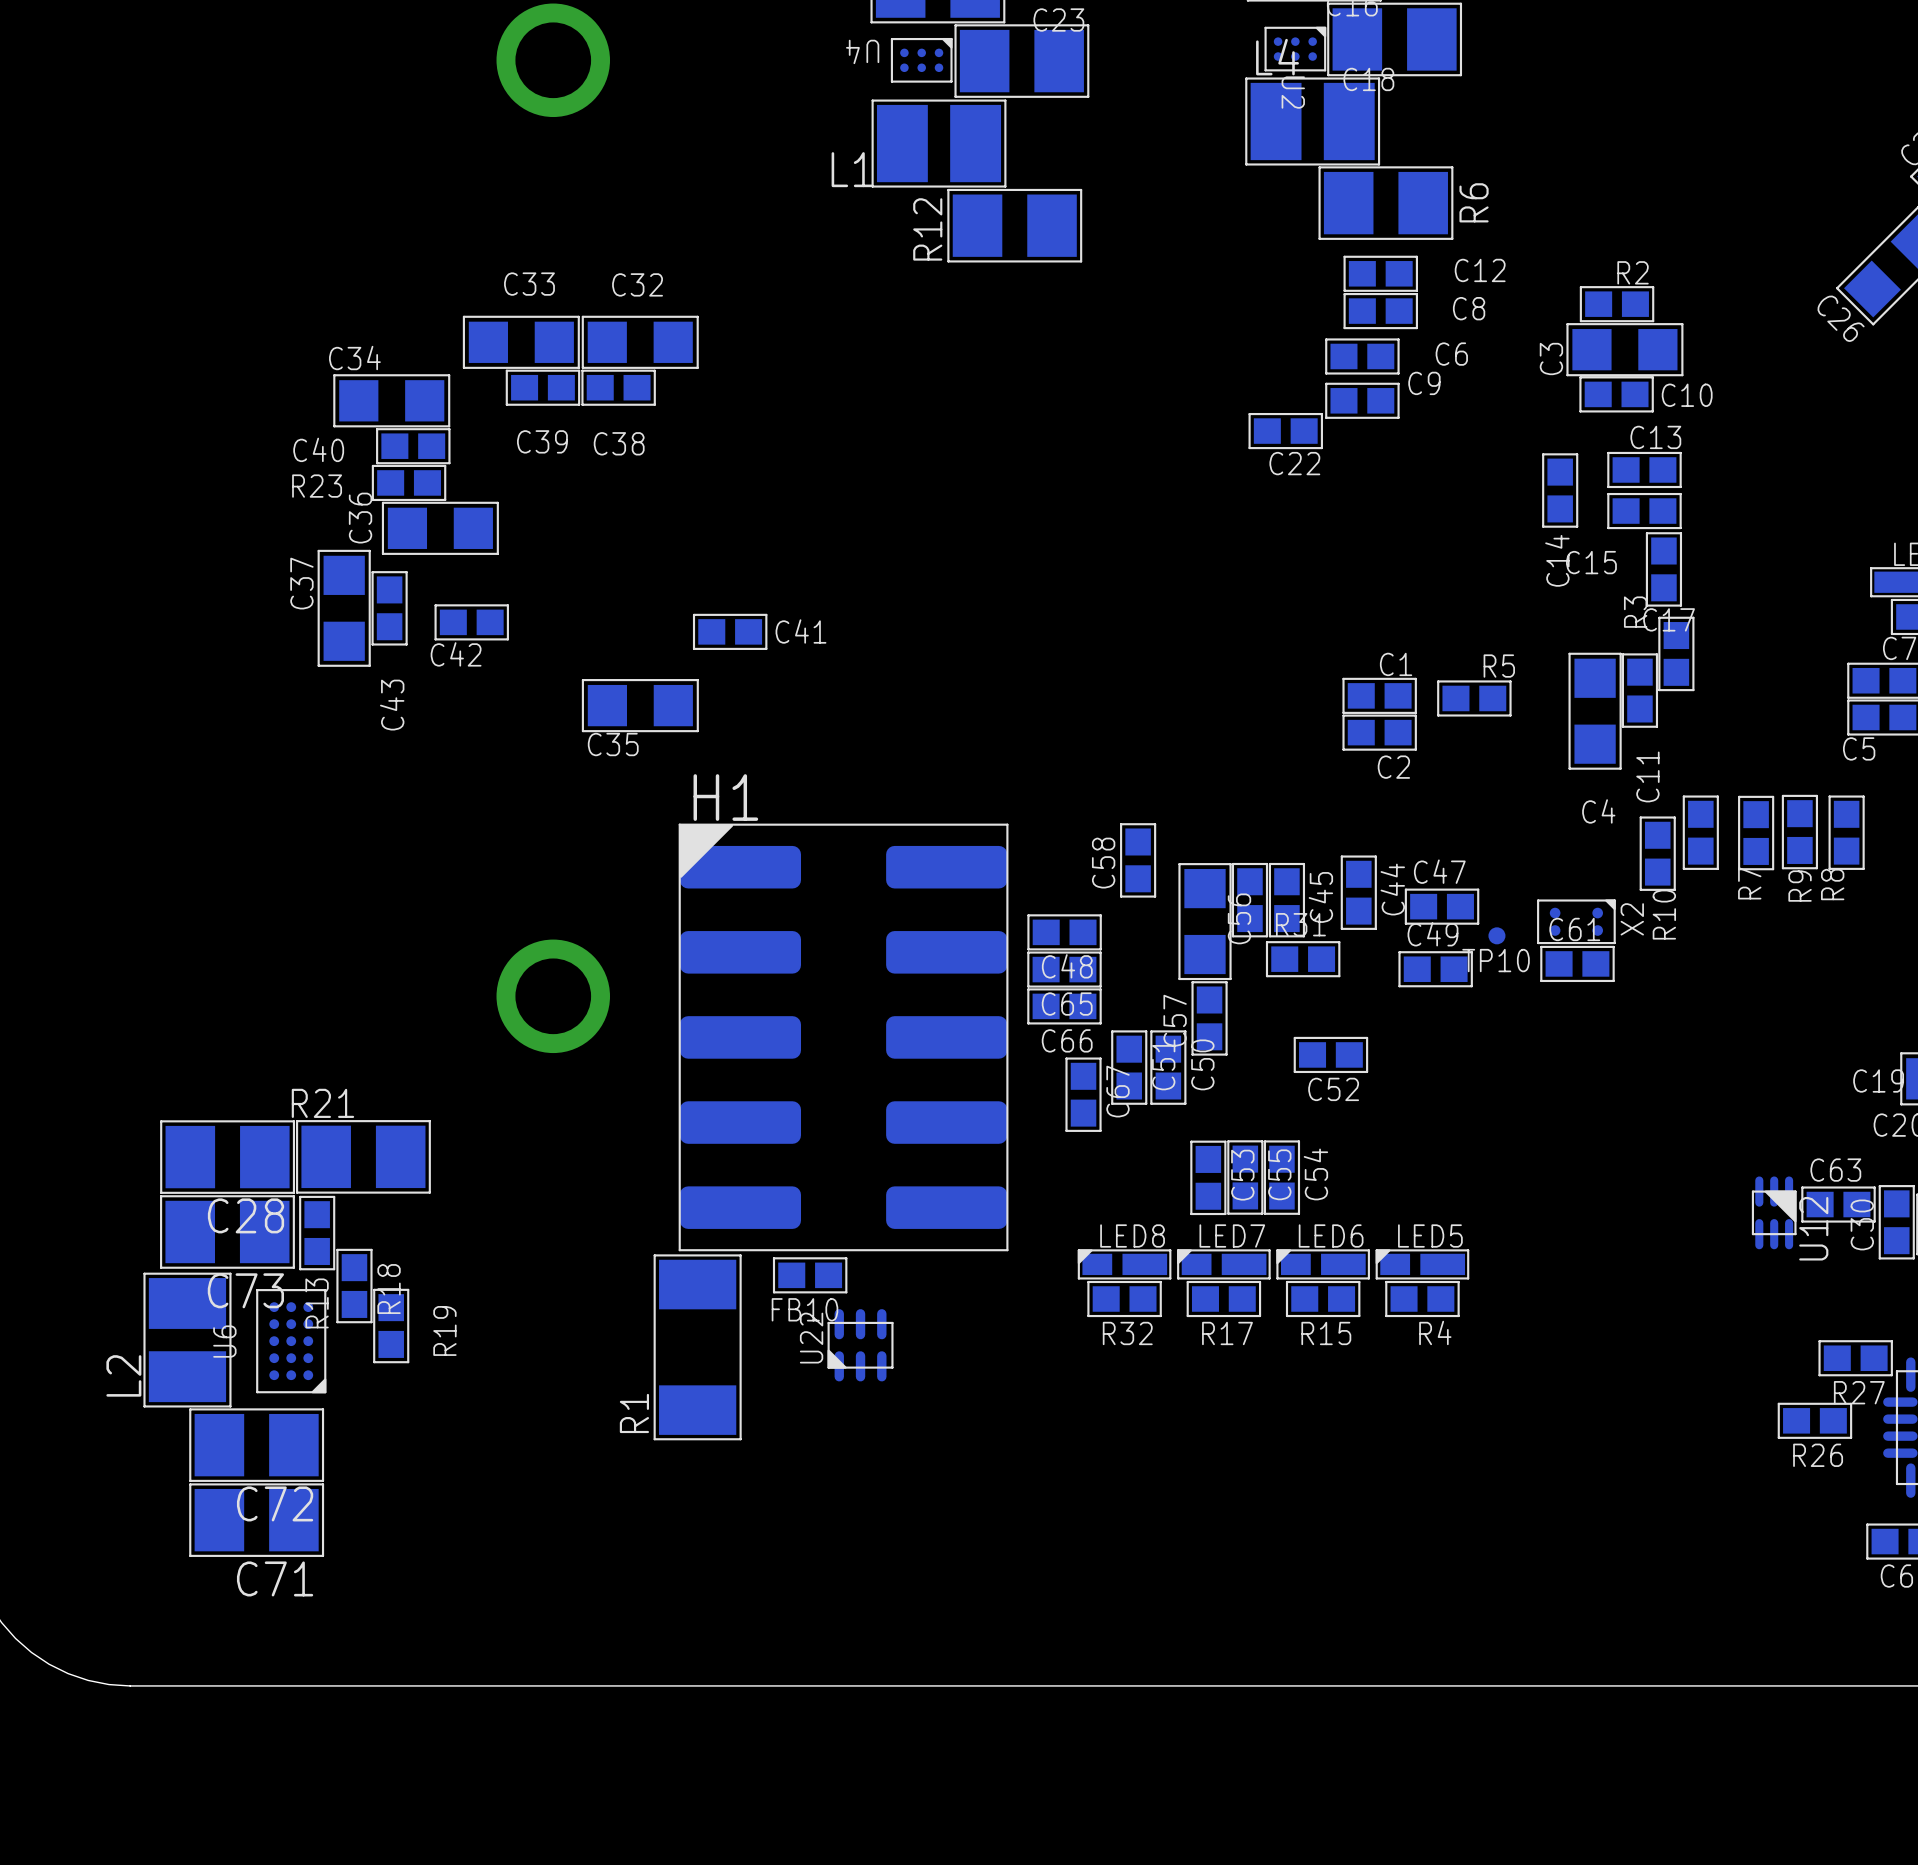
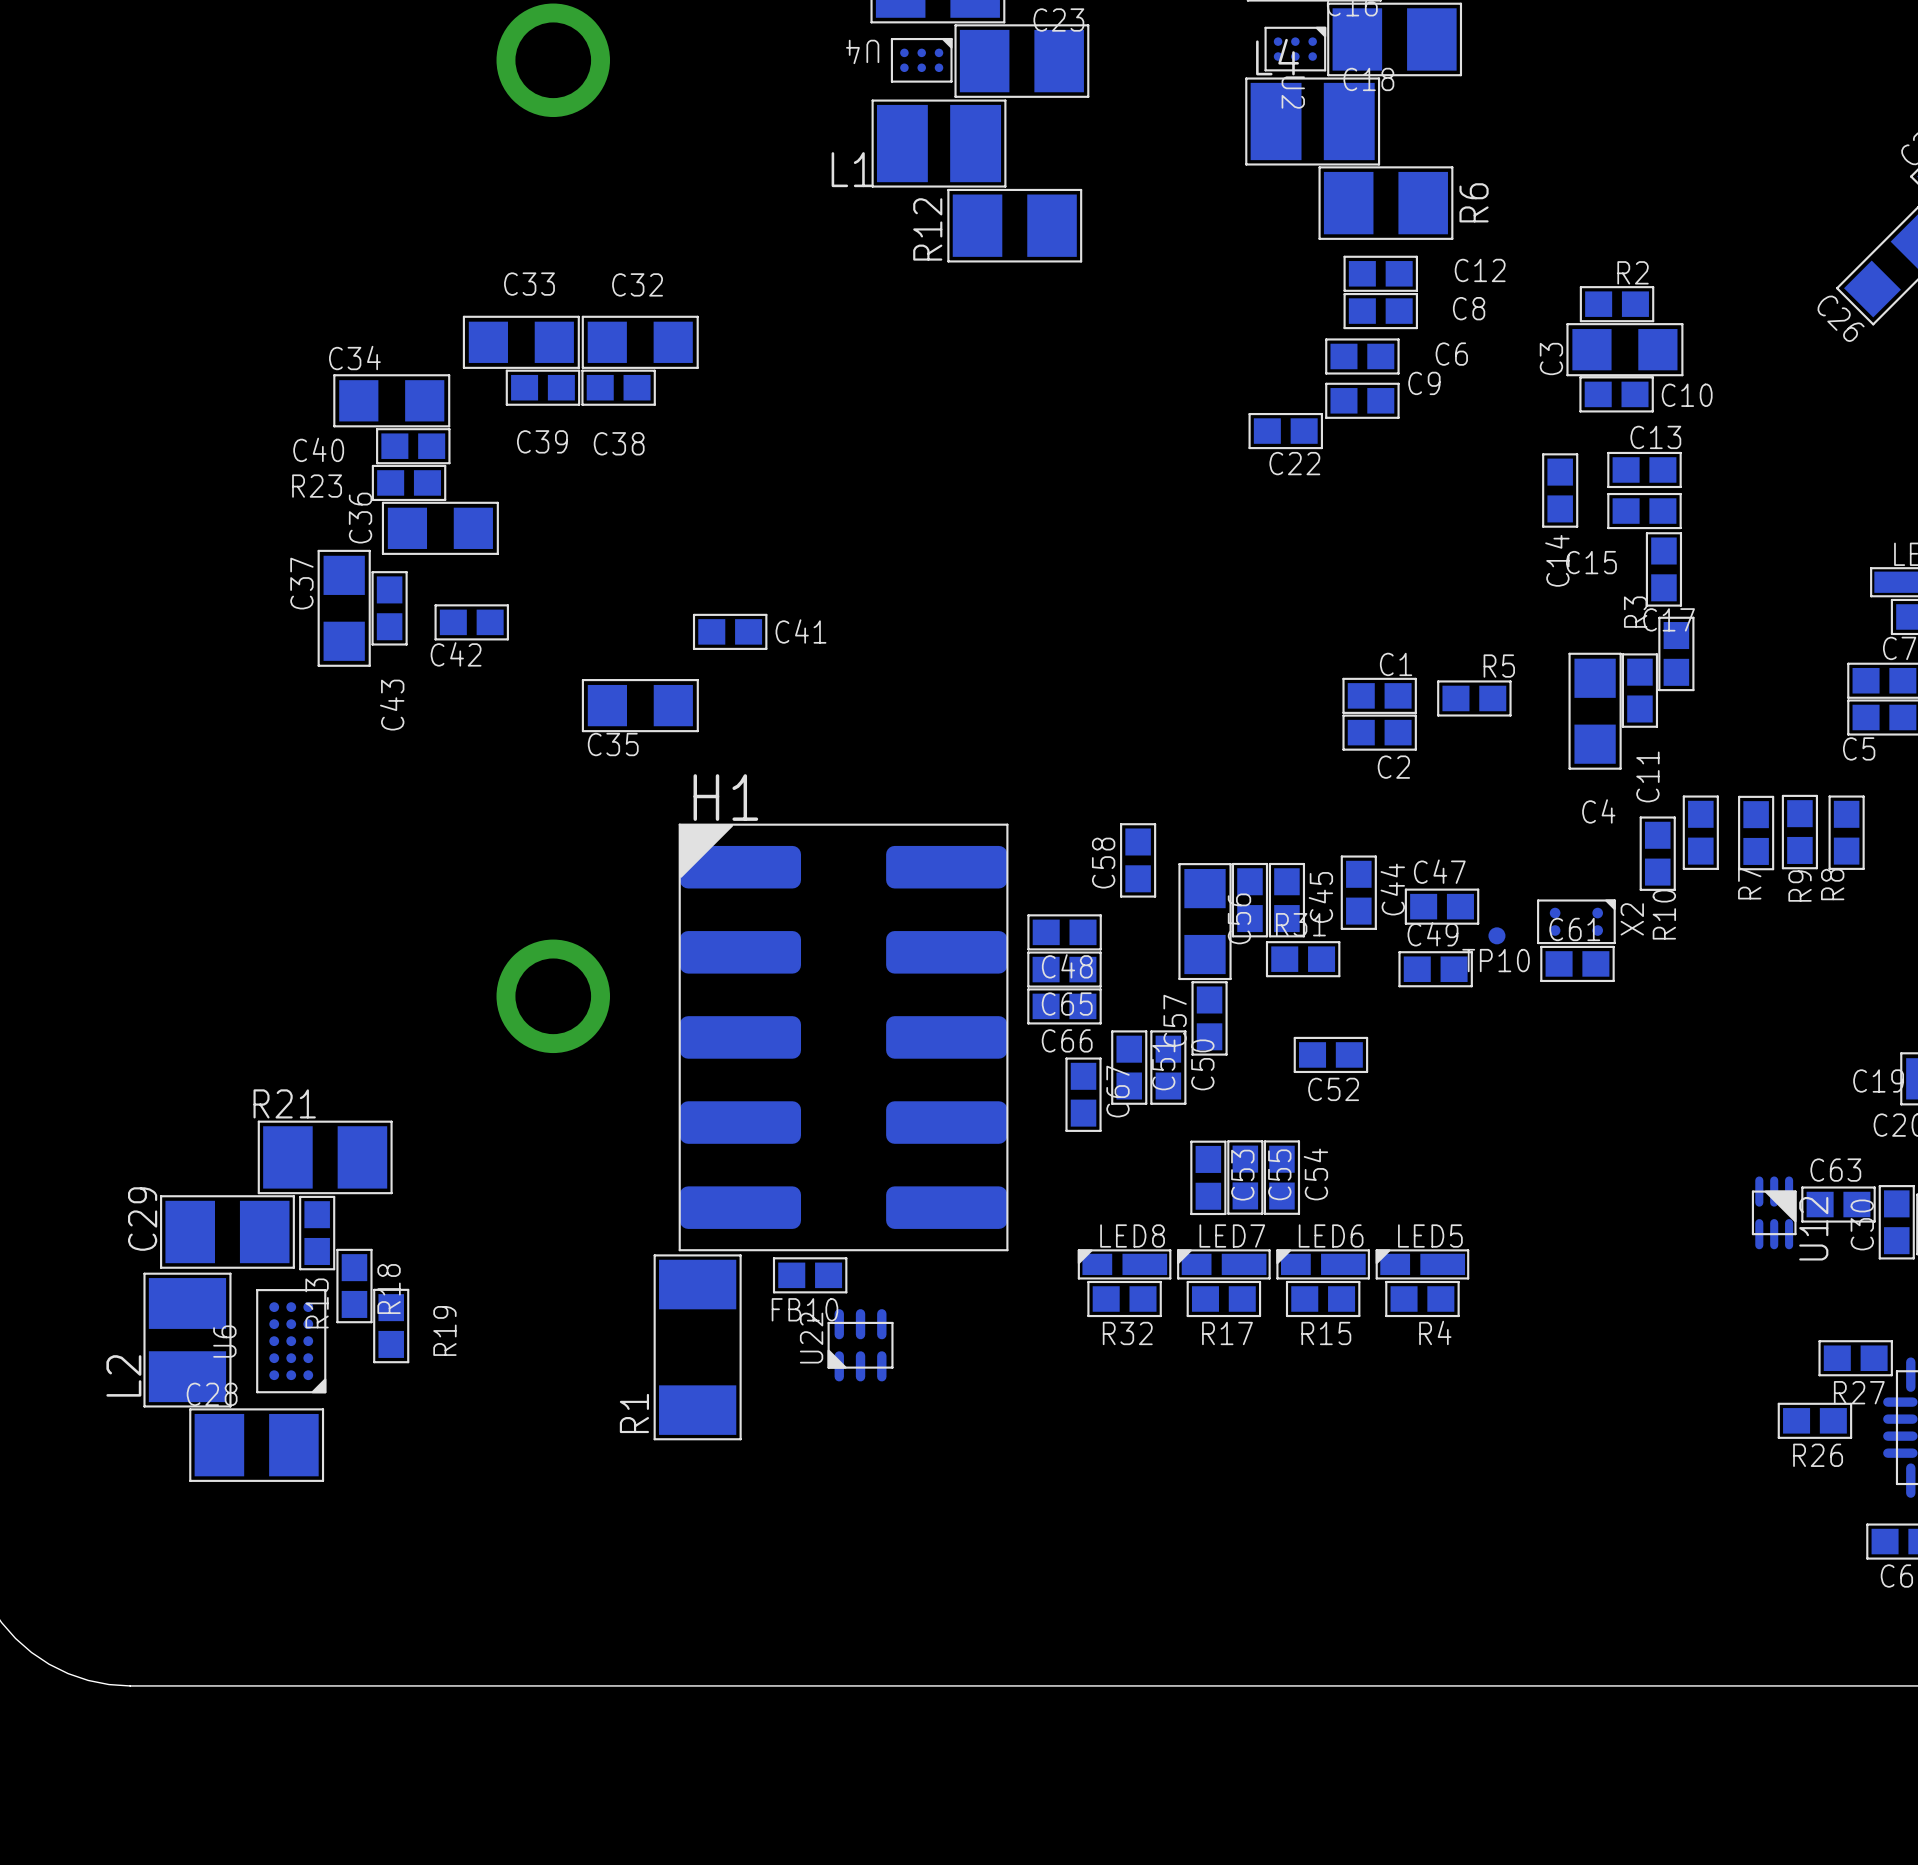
R21 position: (363, 1156) -> (325, 1157)
C28: (227, 1157) -> none
C73 name: C73 (245, 1290) -> C29 (142, 1219)
C72 name: C72 (275, 1503) -> C28 (212, 1394)
C71: (256, 1520) -> none

